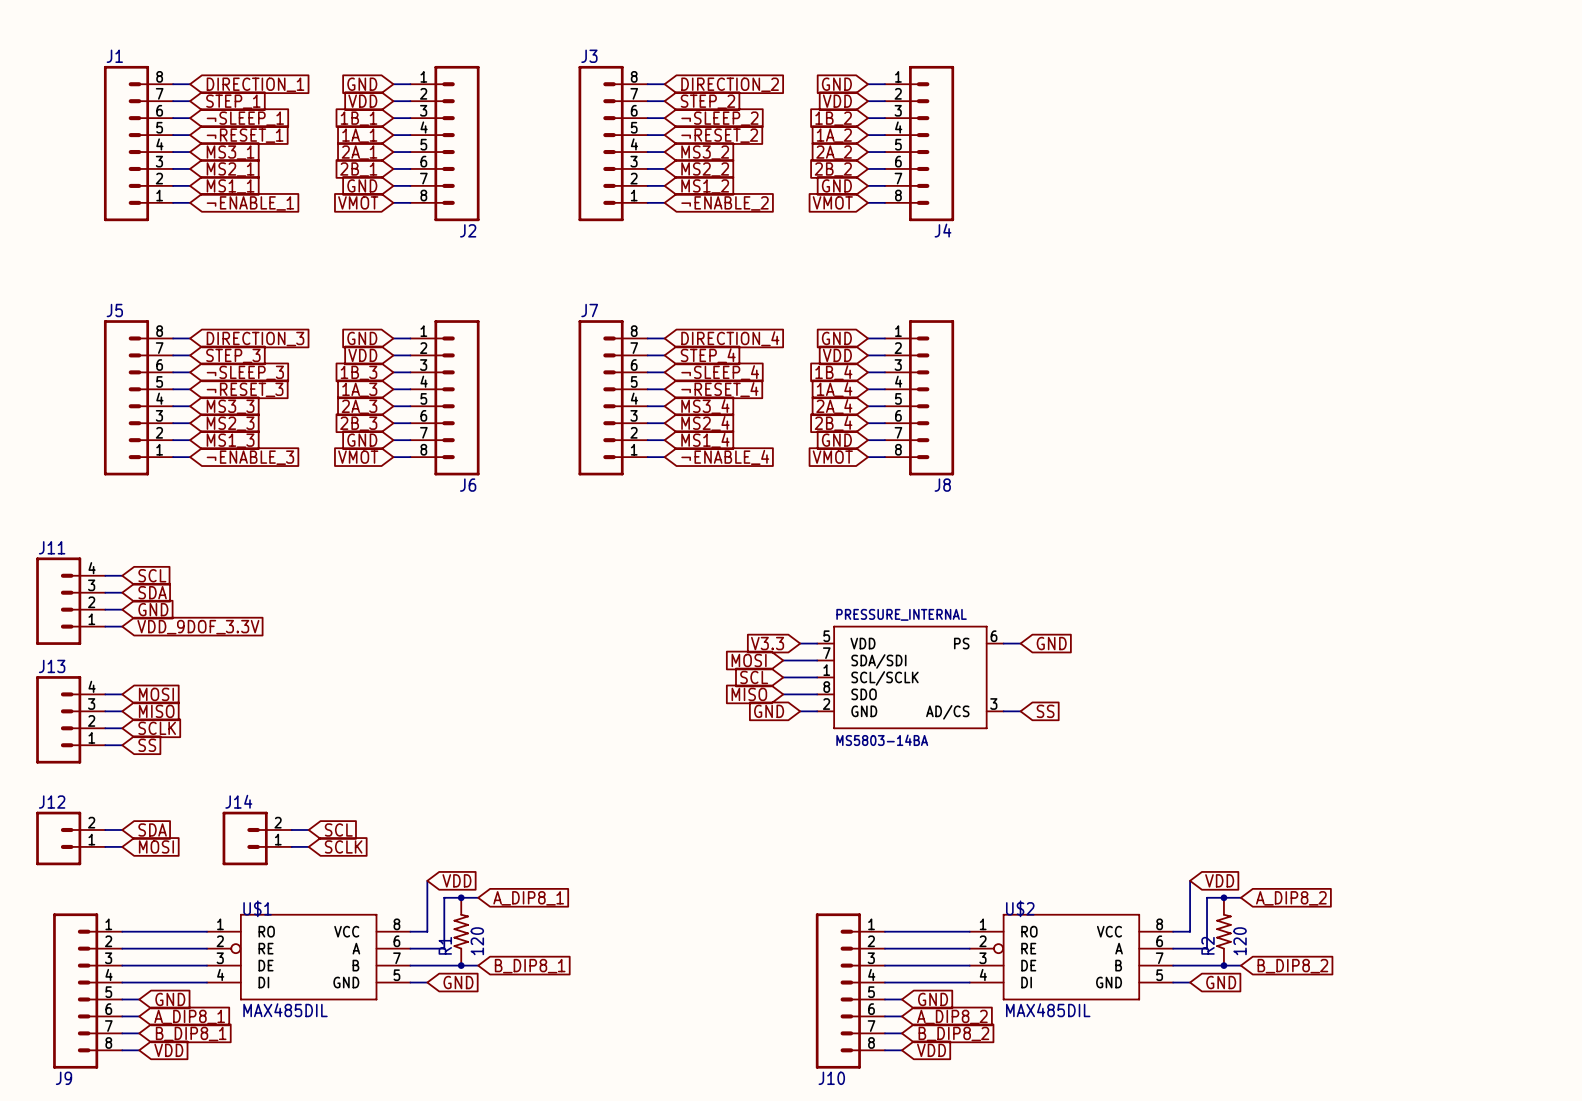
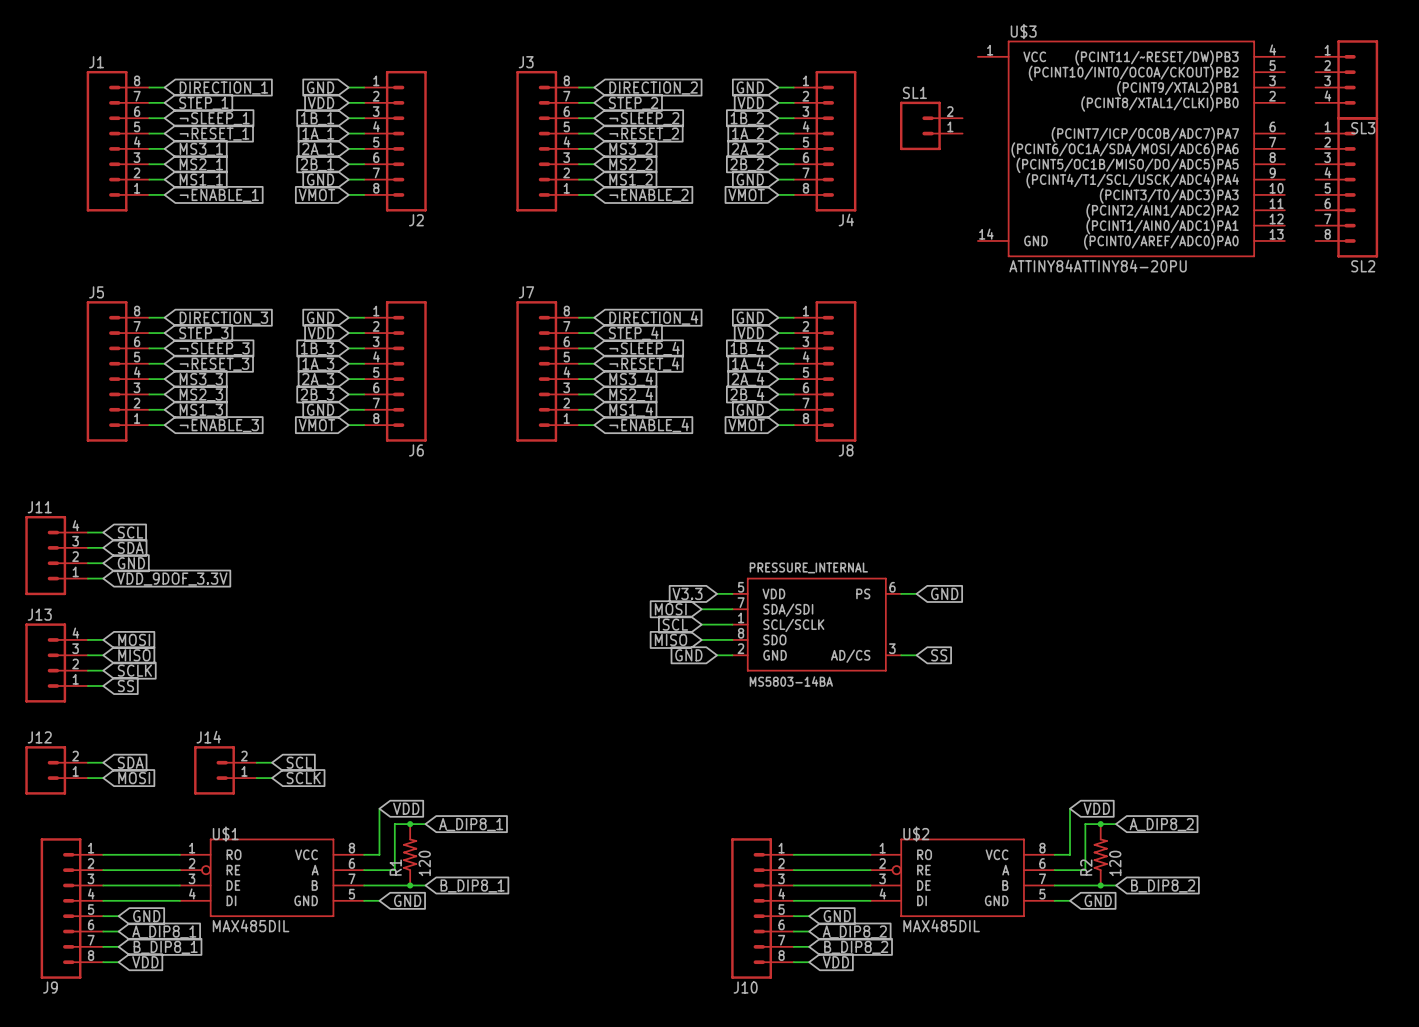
SL3: none -> (1346, 79)
SL1: none -> (931, 125)
U$3: none -> ATTINY84ATTINY84-20PU (1131, 148)
SL2: none -> (1346, 187)

